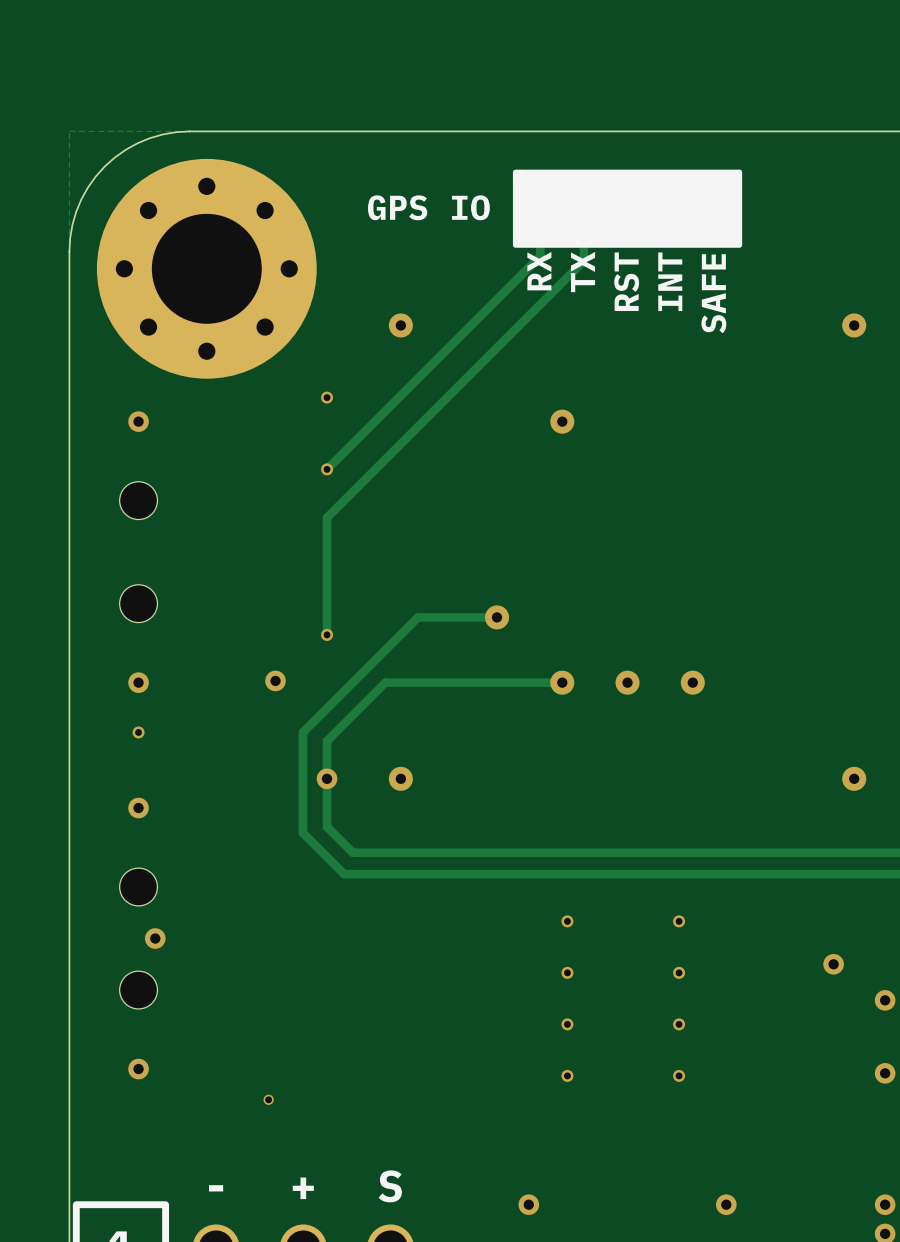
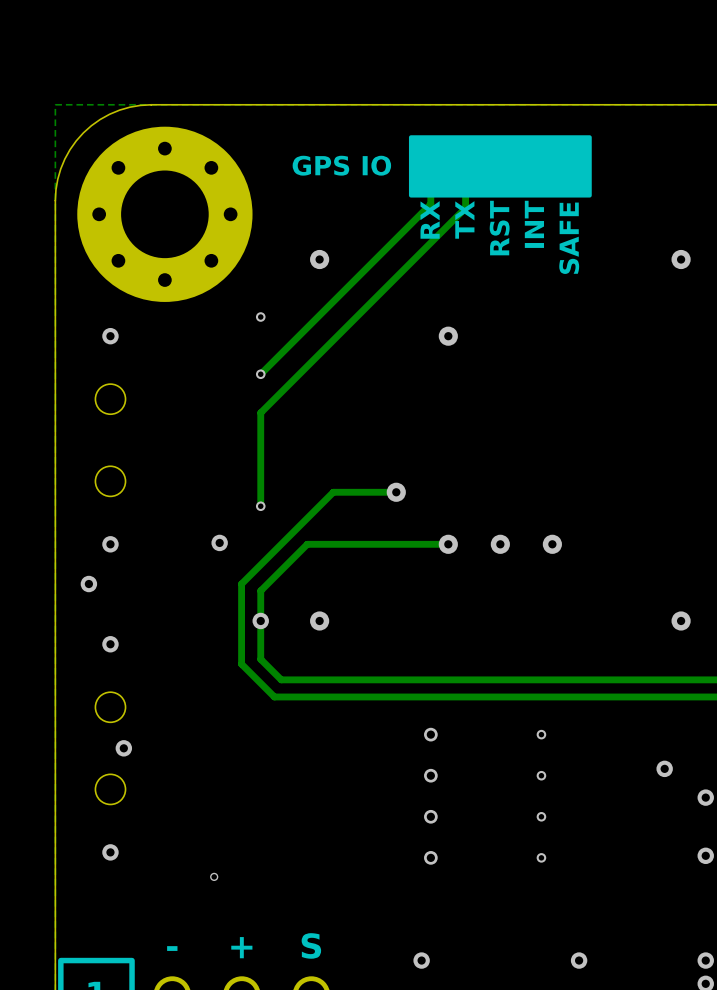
via: none -> (88, 584)
via: (138, 732) -> none
via: none -> (430, 734)
via: (567, 921) -> none
via: none -> (430, 775)
via: (567, 972) -> none
via: none -> (430, 816)
via: (567, 1024) -> none
via: none -> (430, 857)
via: (567, 1075) -> none

